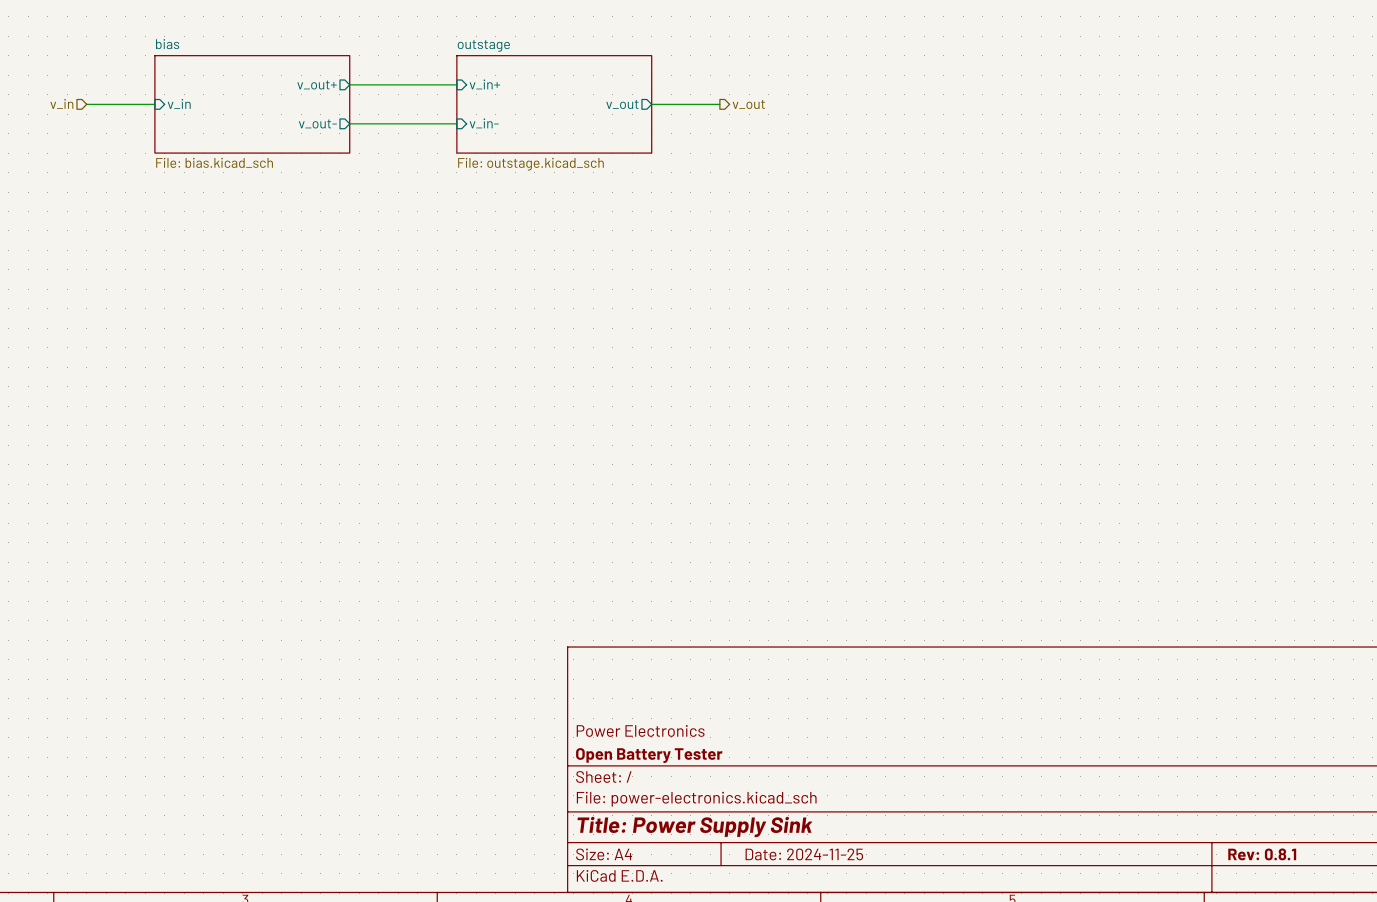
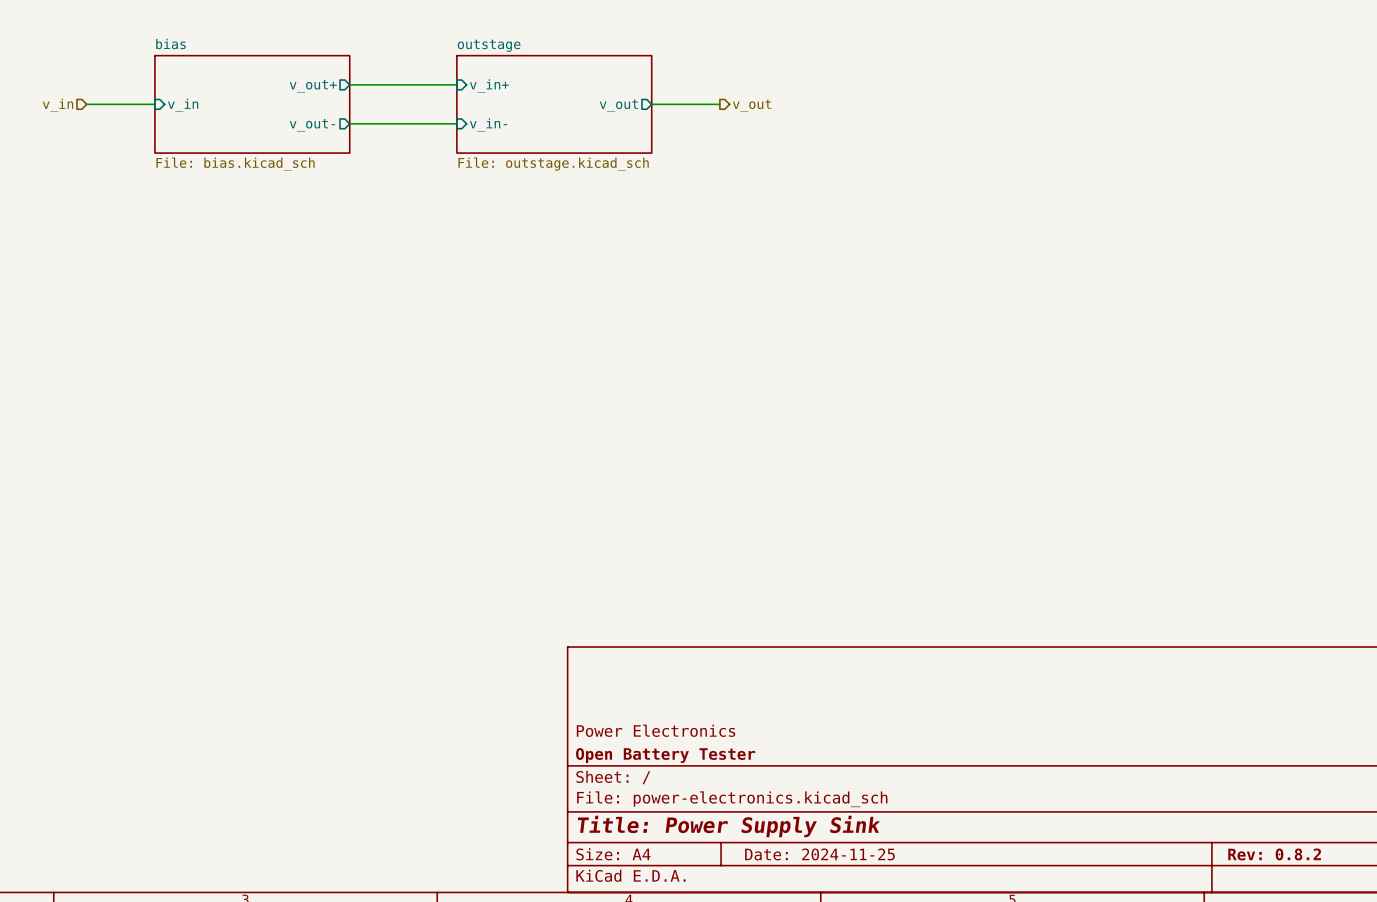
title block: Rev: 0.8.1 (1262, 854) -> Rev: 0.8.2 (1274, 854)

